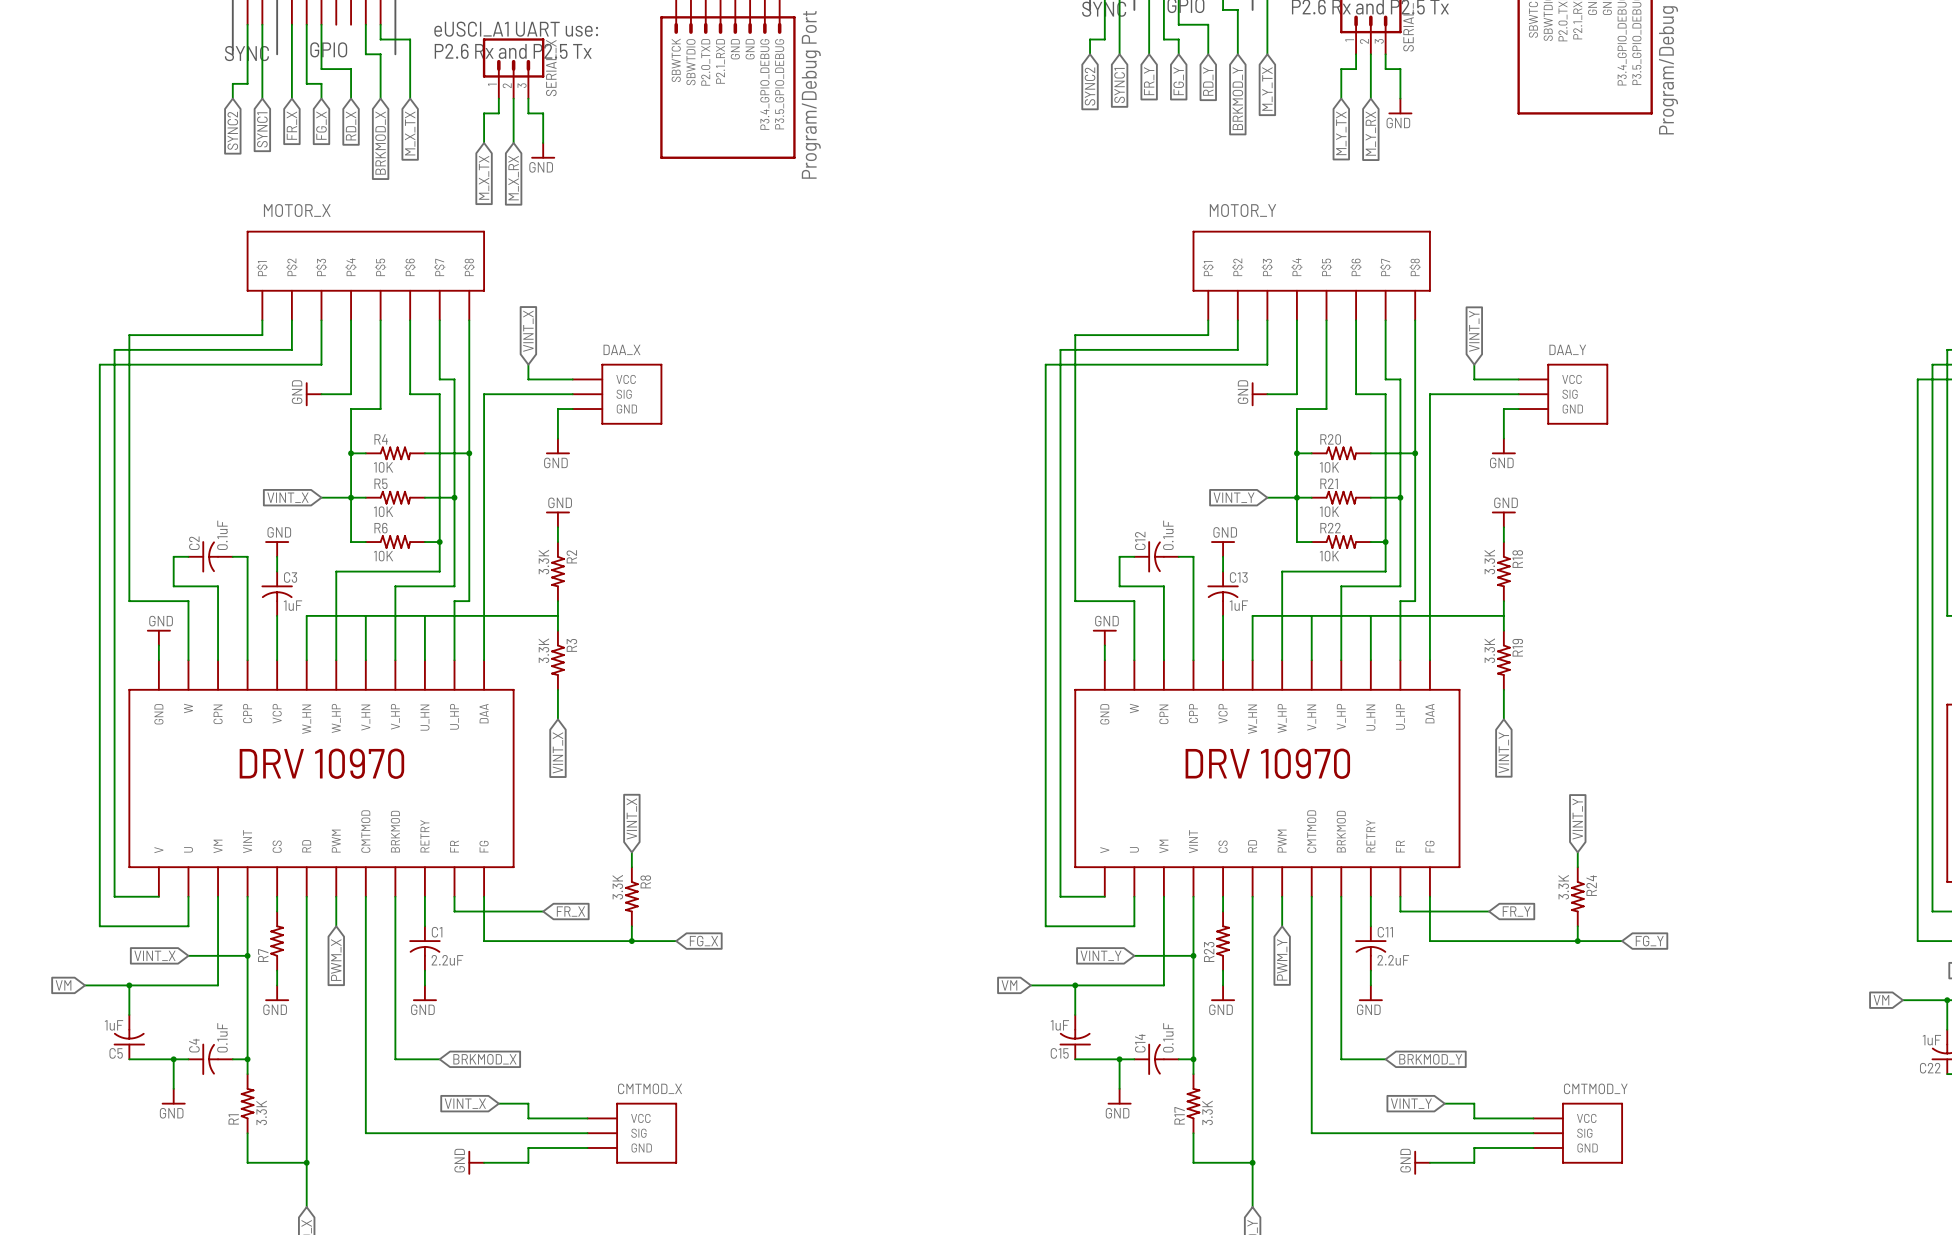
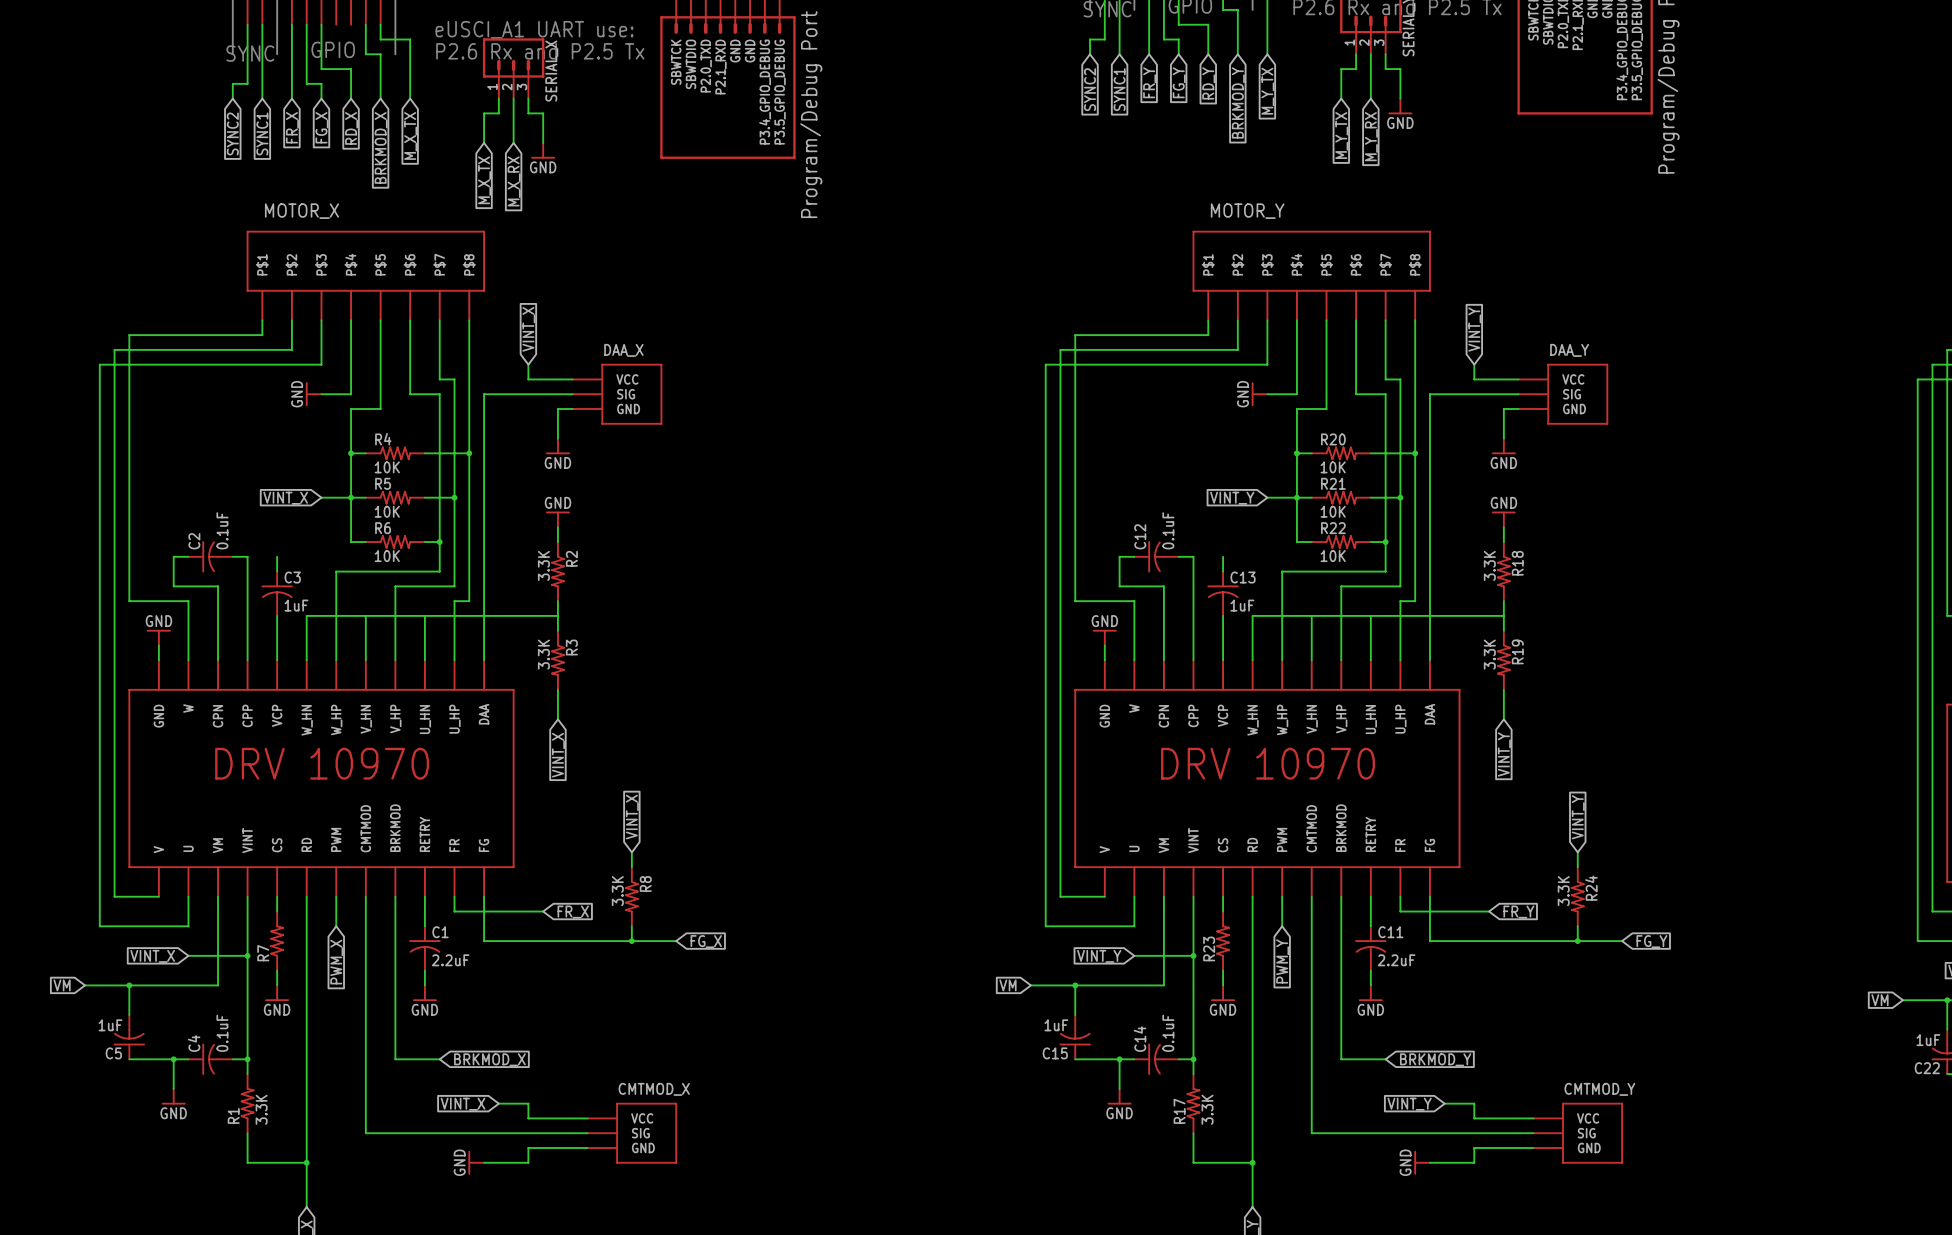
power symbol: GND (277, 549) -> none
power symbol: GND (1223, 549) -> none

